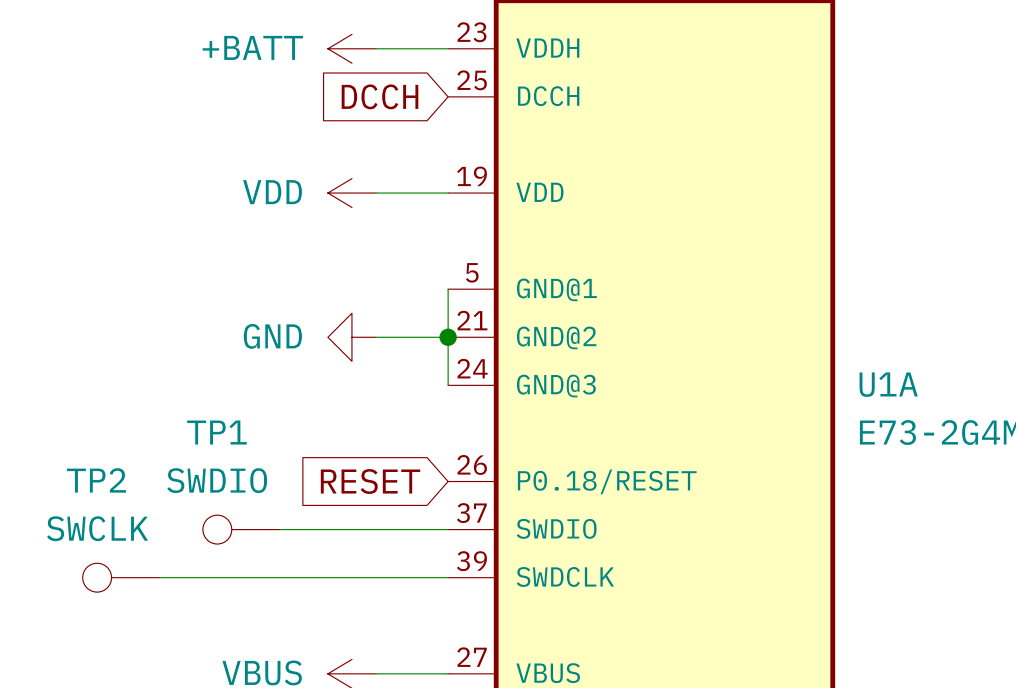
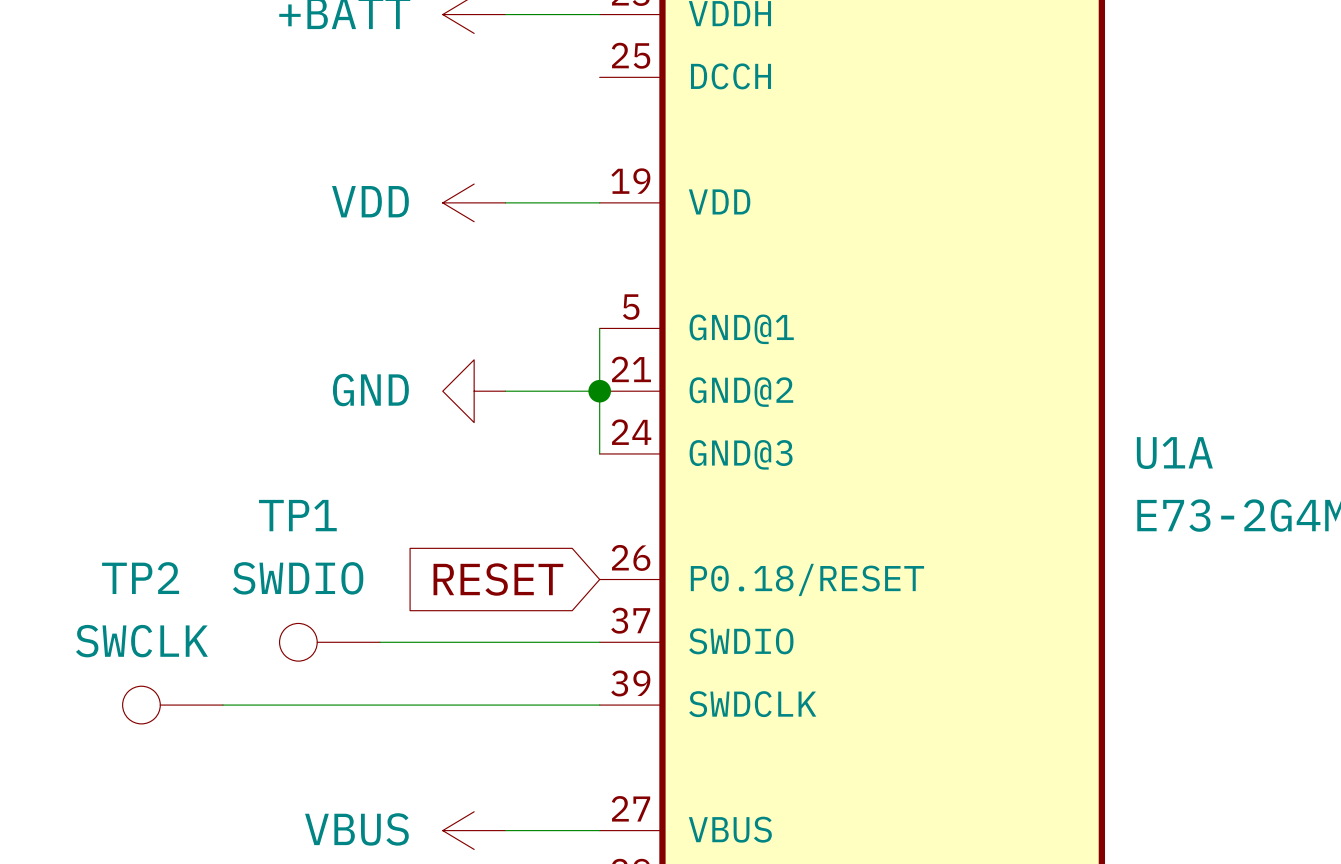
global label: DCCH (380, 96) -> none

